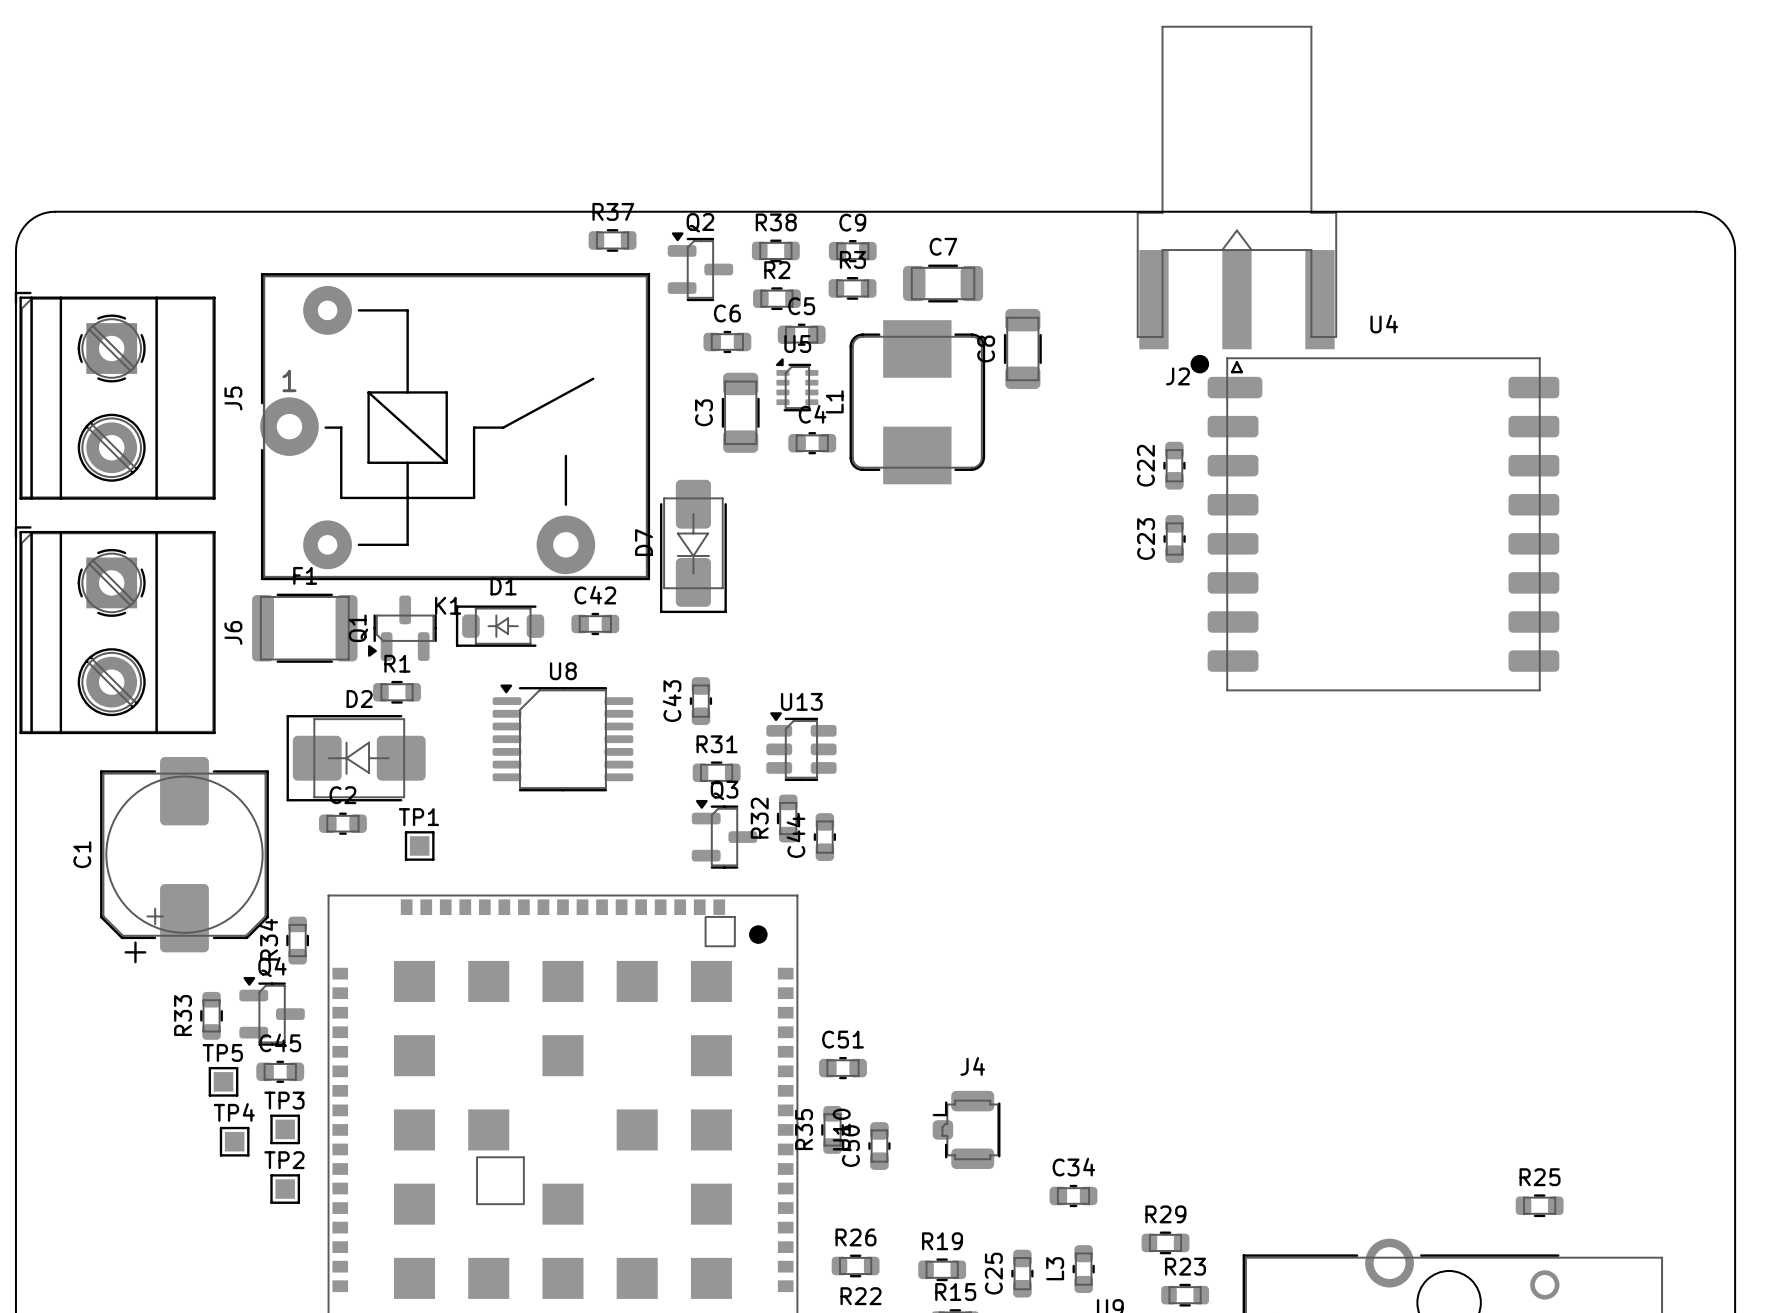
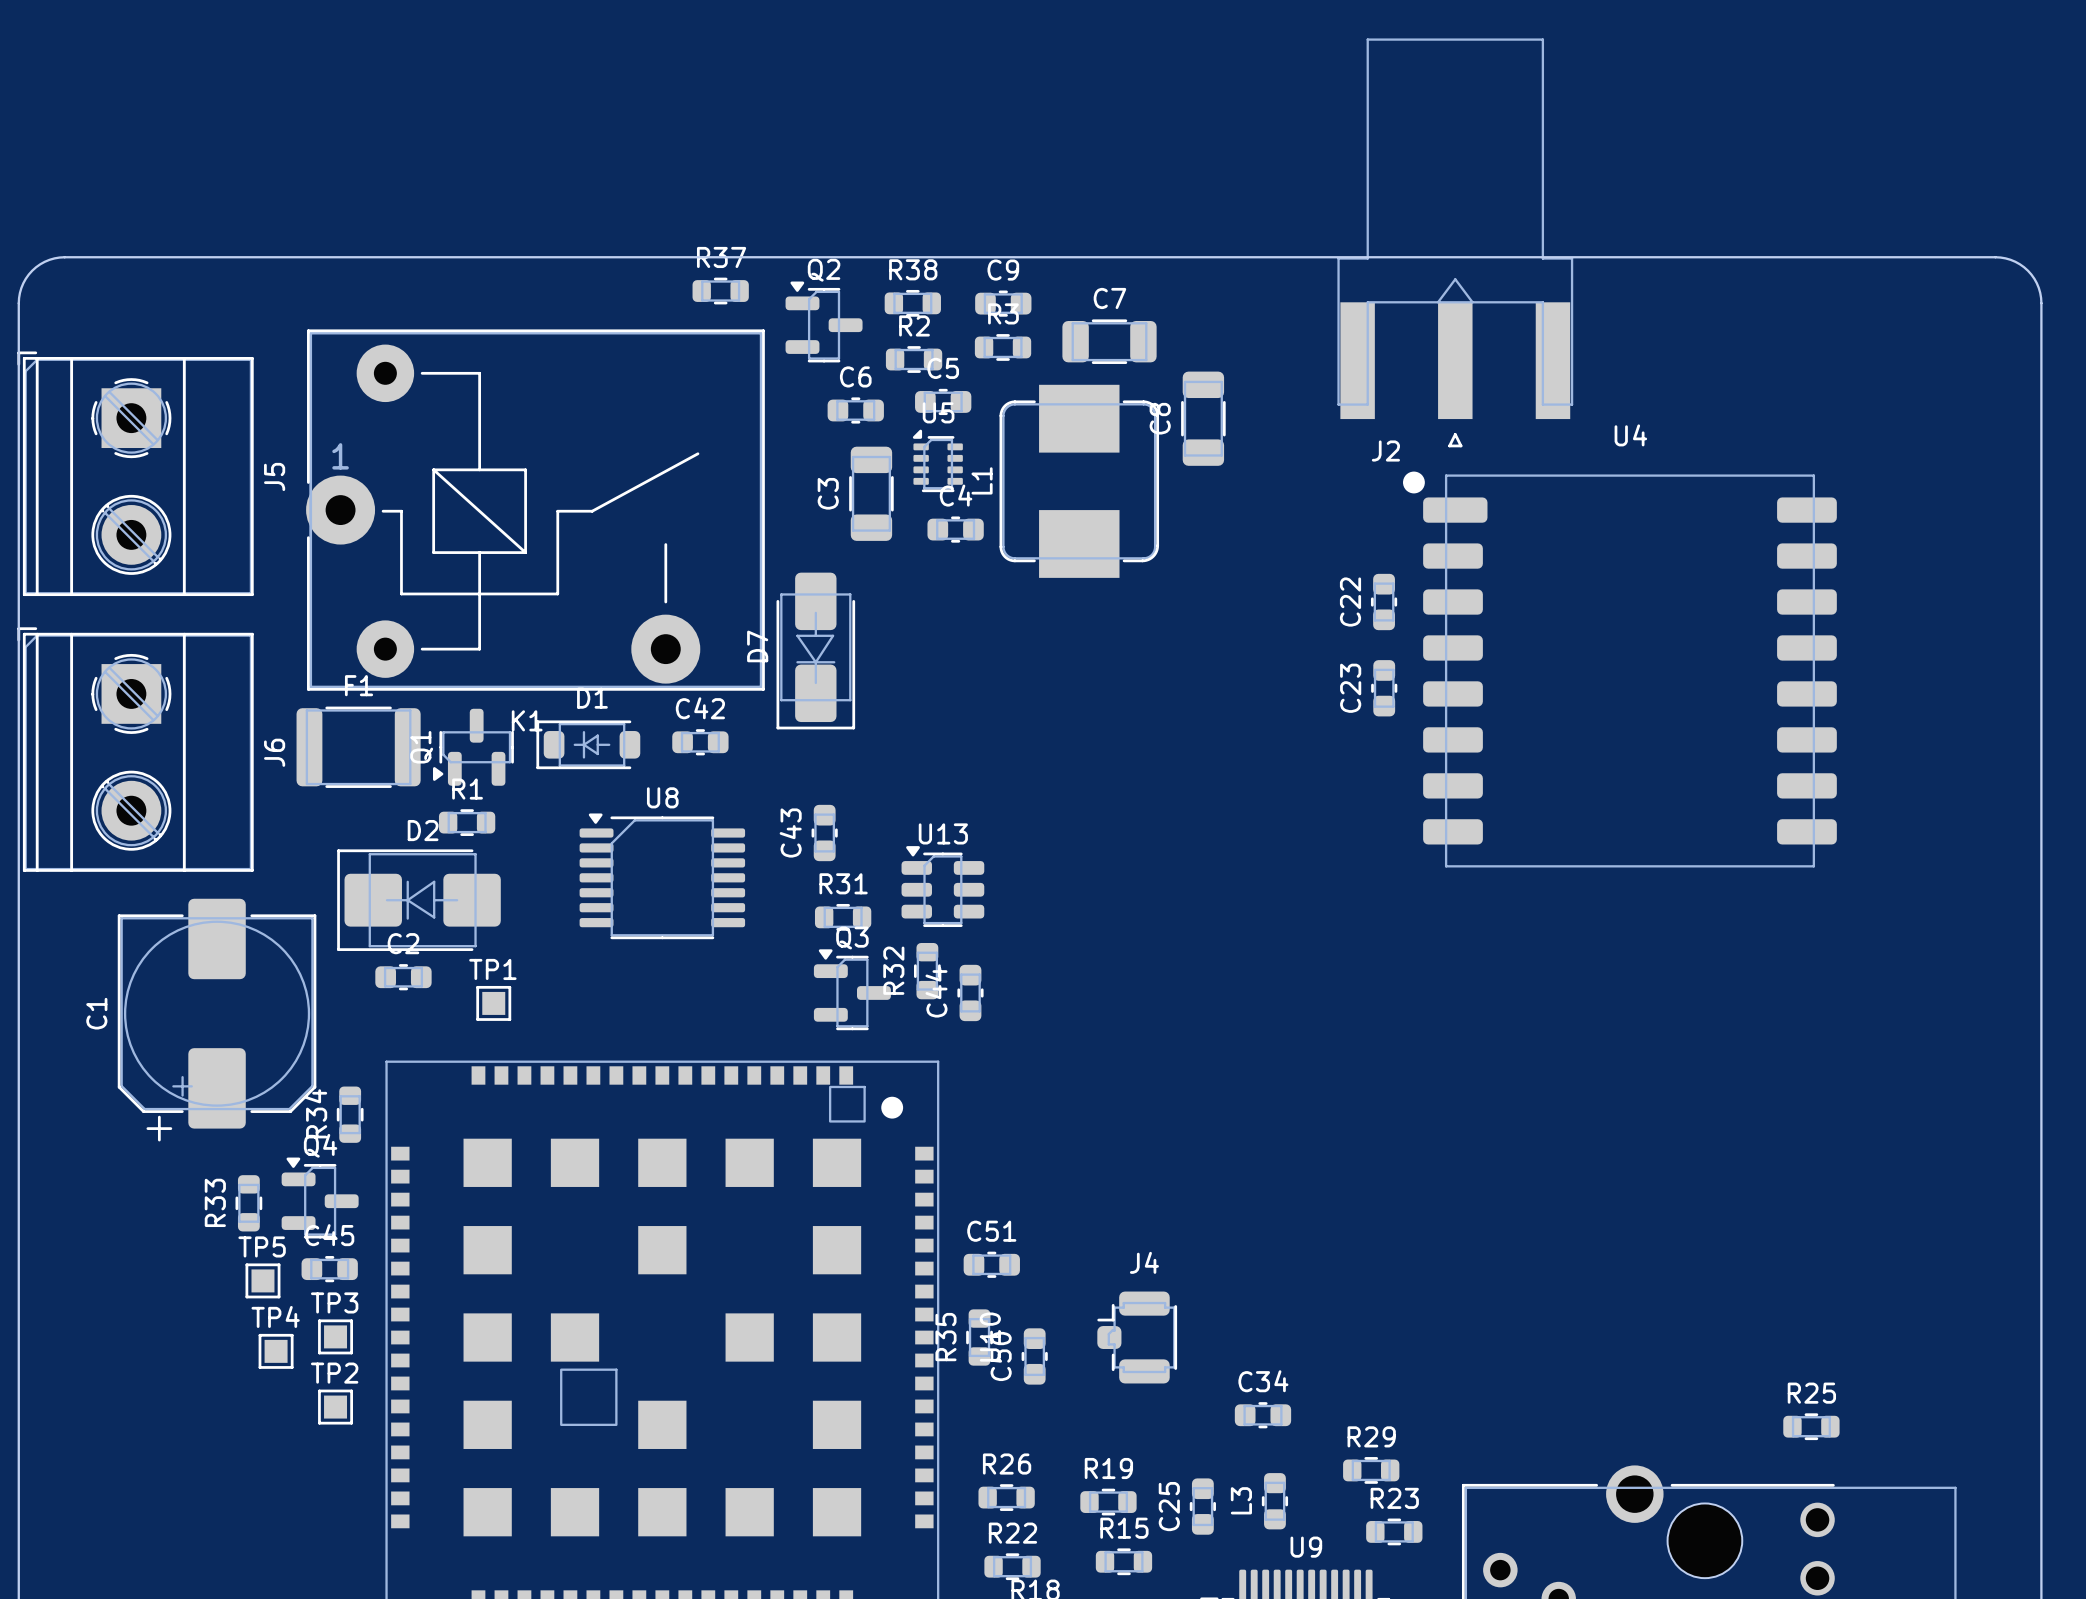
C22 position: (1174, 465) -> (1384, 602)
U4 position: (1374, 523) -> (1619, 669)
C23 position: (1174, 539) -> (1384, 688)

